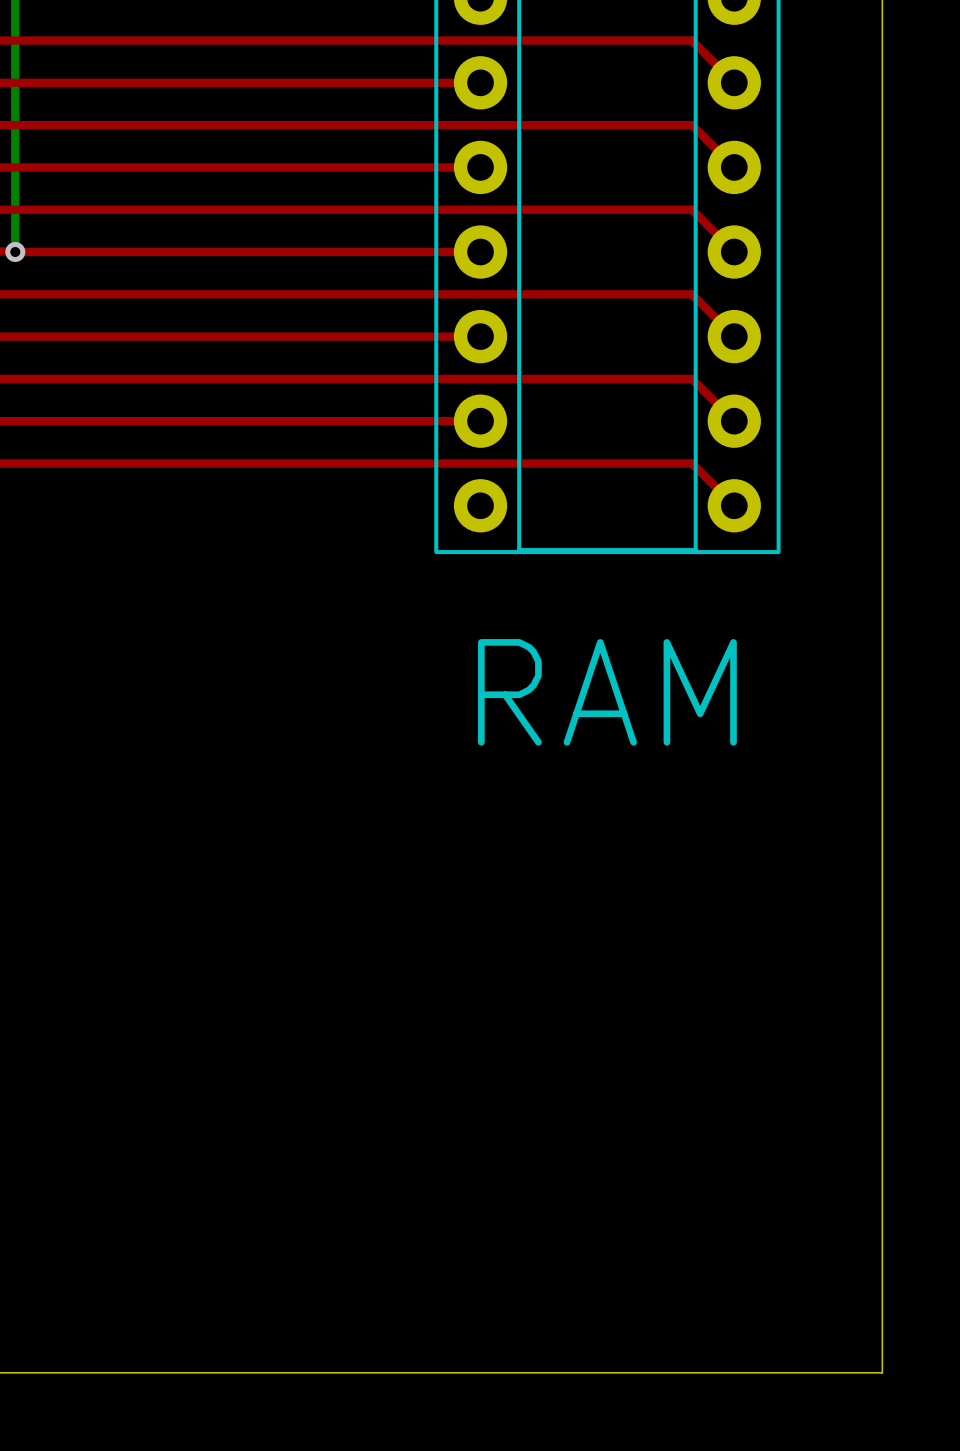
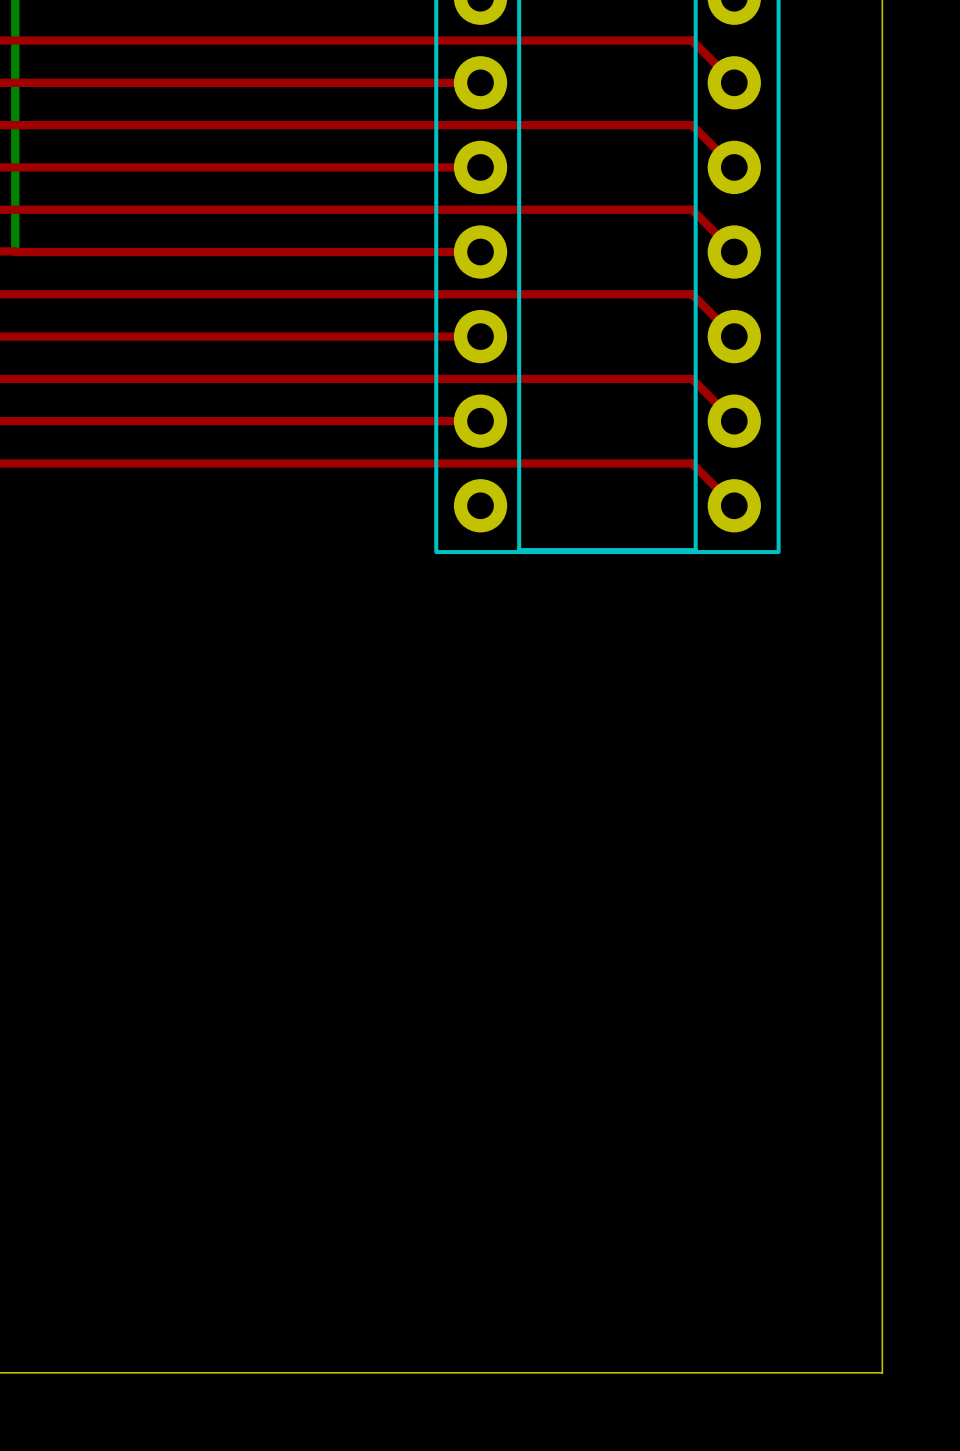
via: (15, 252) -> none
text: RAM (607, 692) -> none

